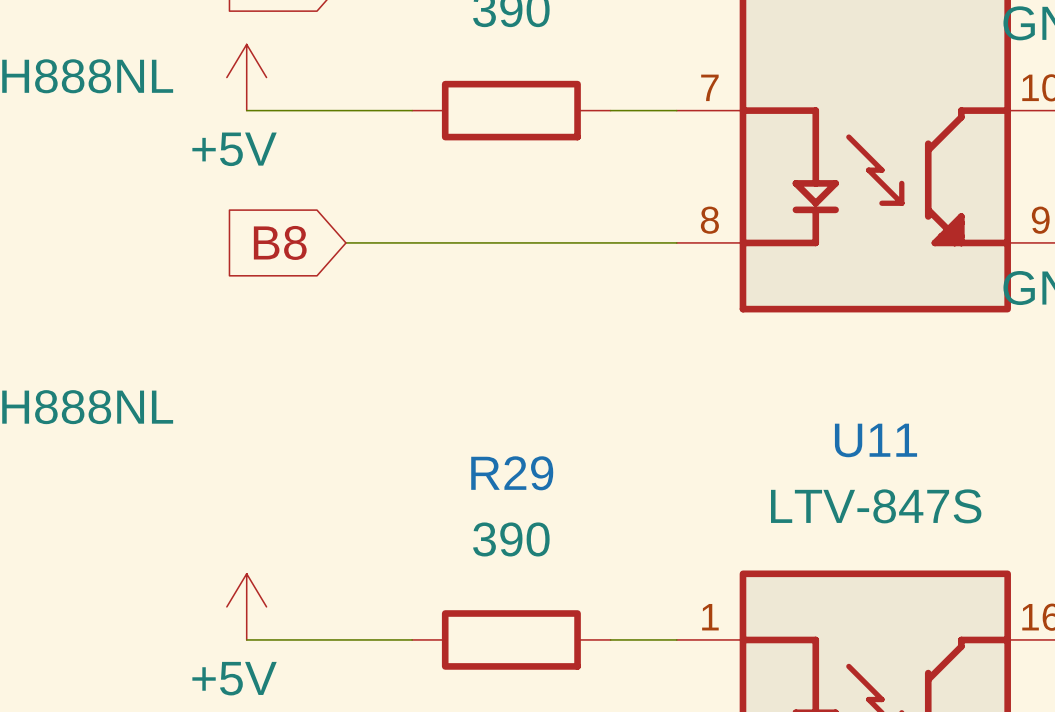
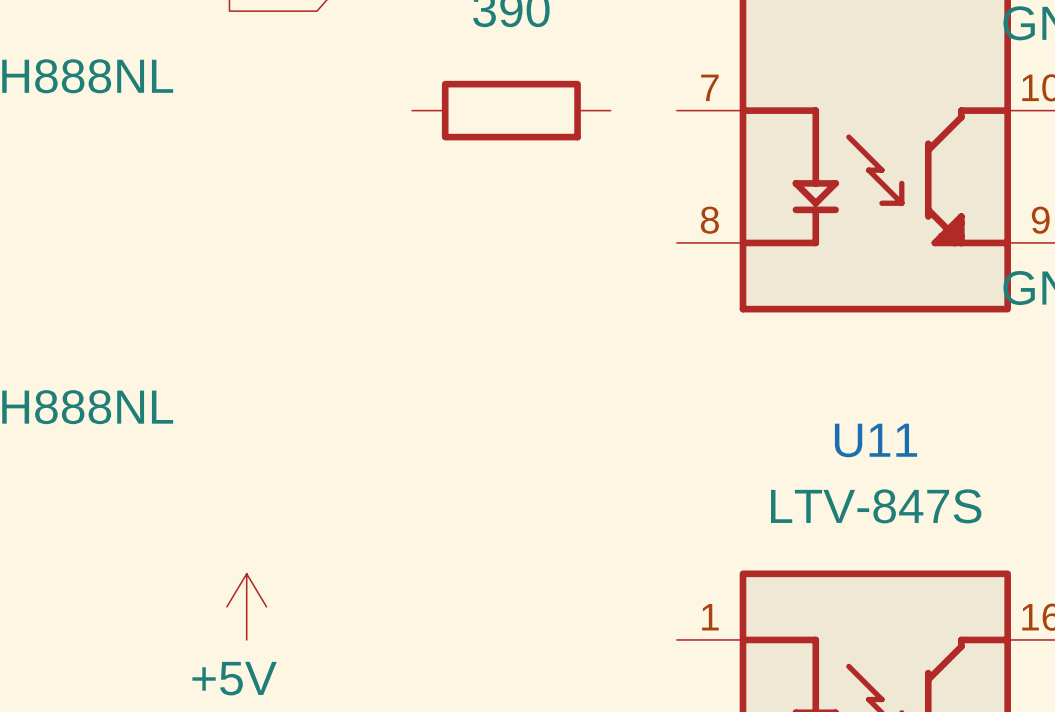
power symbol: +5V (246, 77) -> none
wire: (246, 110) (412, 110) -> none
wire: (610, 110) (676, 110) -> none
global label: B8 (280, 242) -> none
wire: (345, 242) (676, 242) -> none
wire: (246, 639) (412, 639) -> none
R29: 390 (511, 639) -> none
wire: (610, 639) (676, 639) -> none

